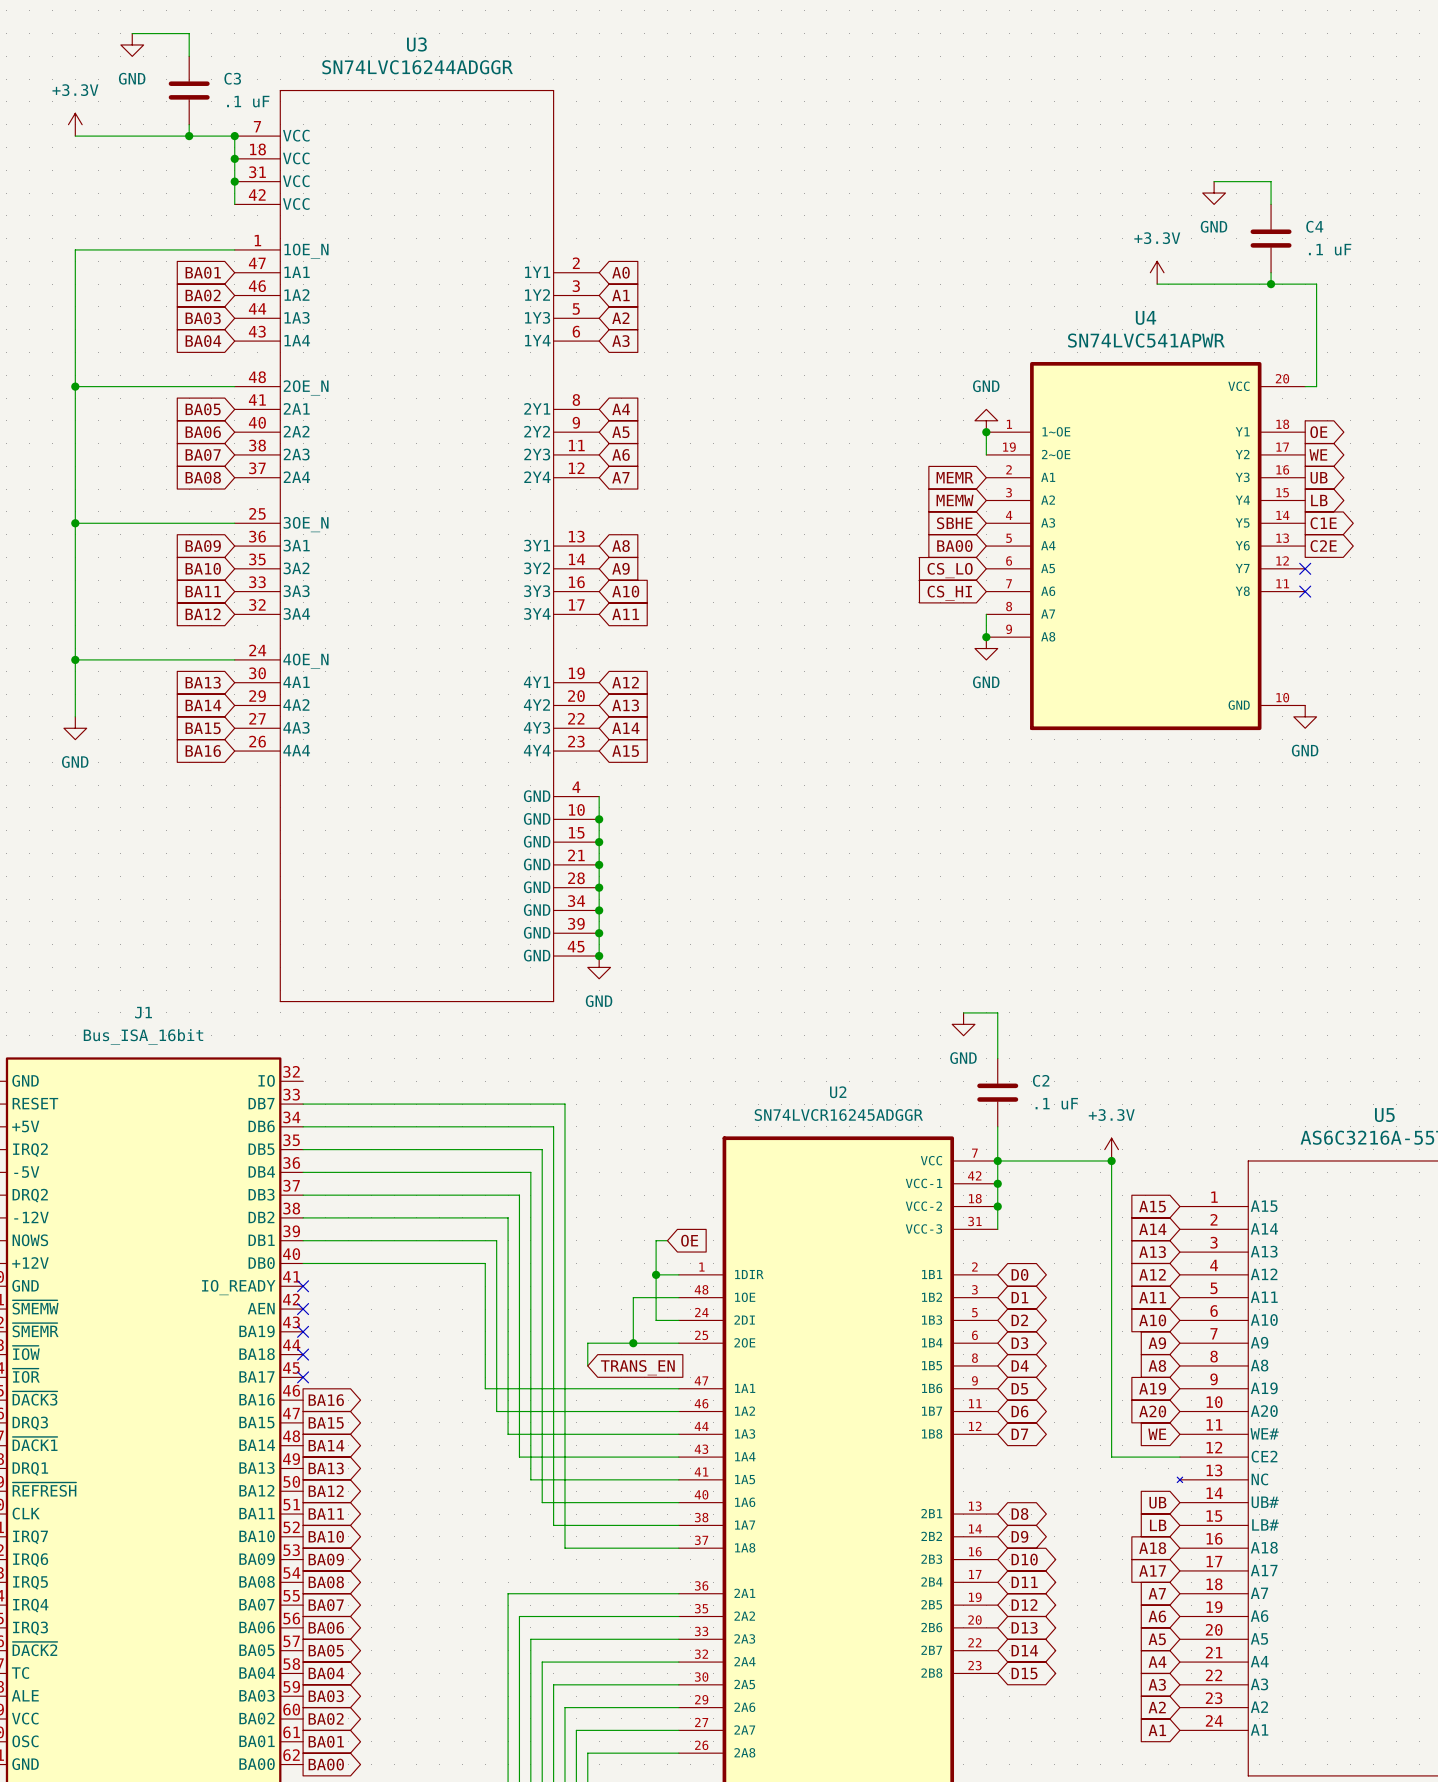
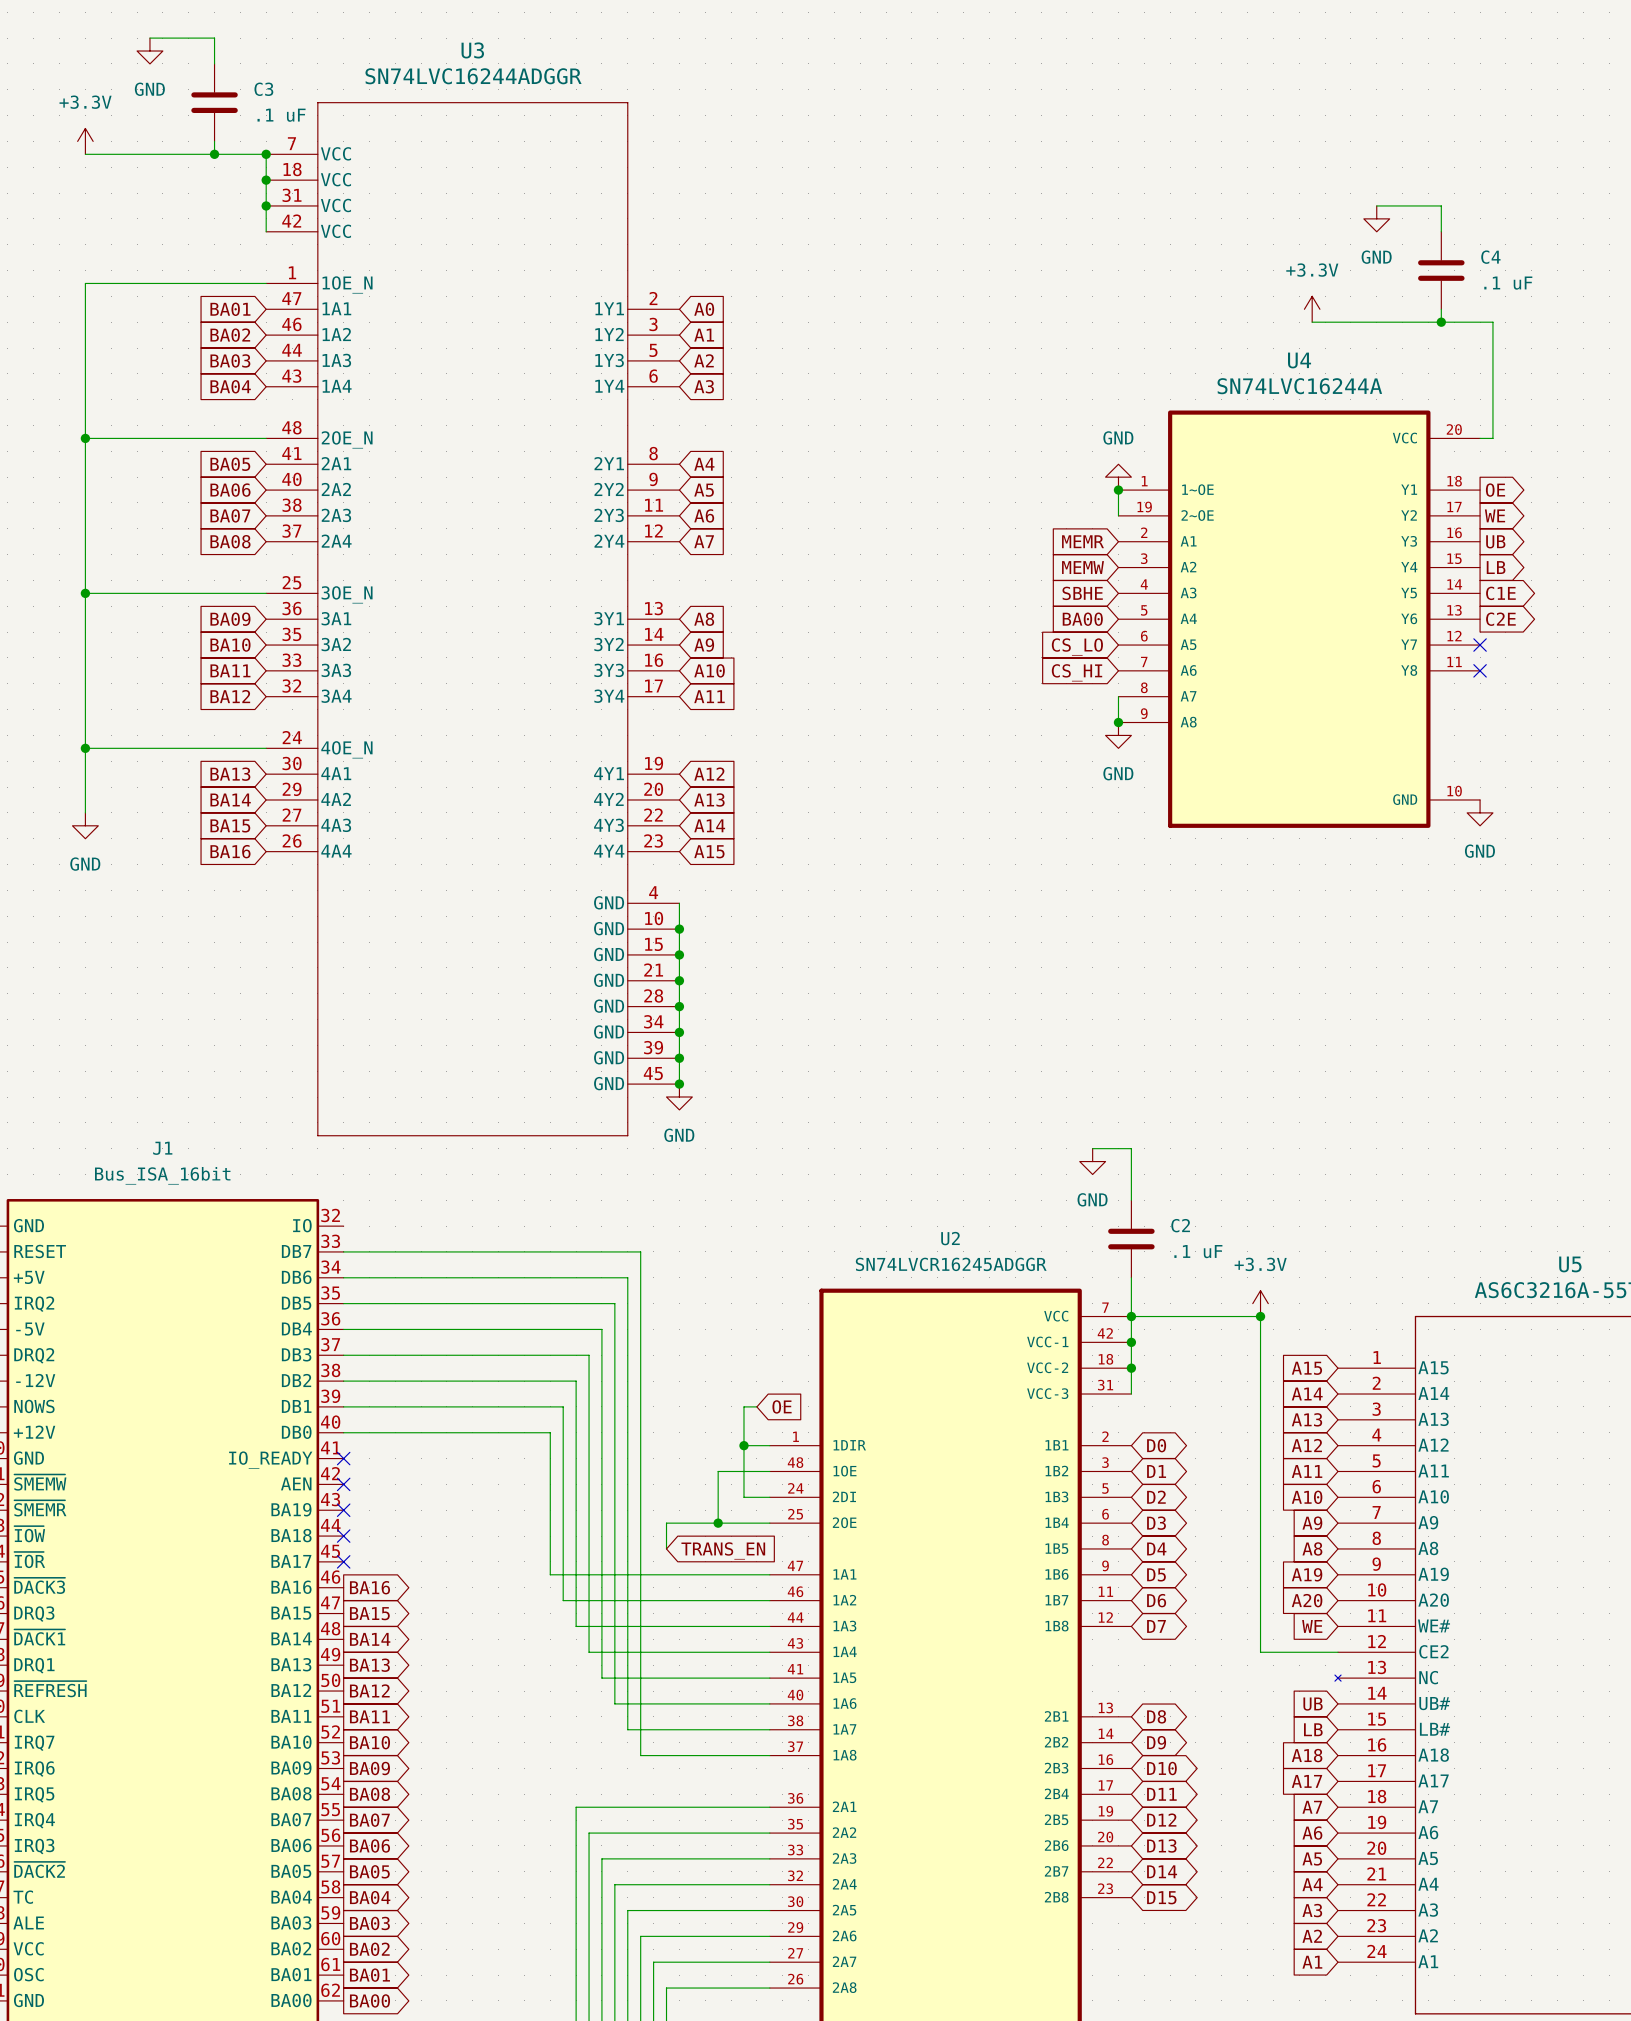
U4 value: SN74LVC541APWR (1146, 340) -> SN74LVC16244A (1299, 386)

